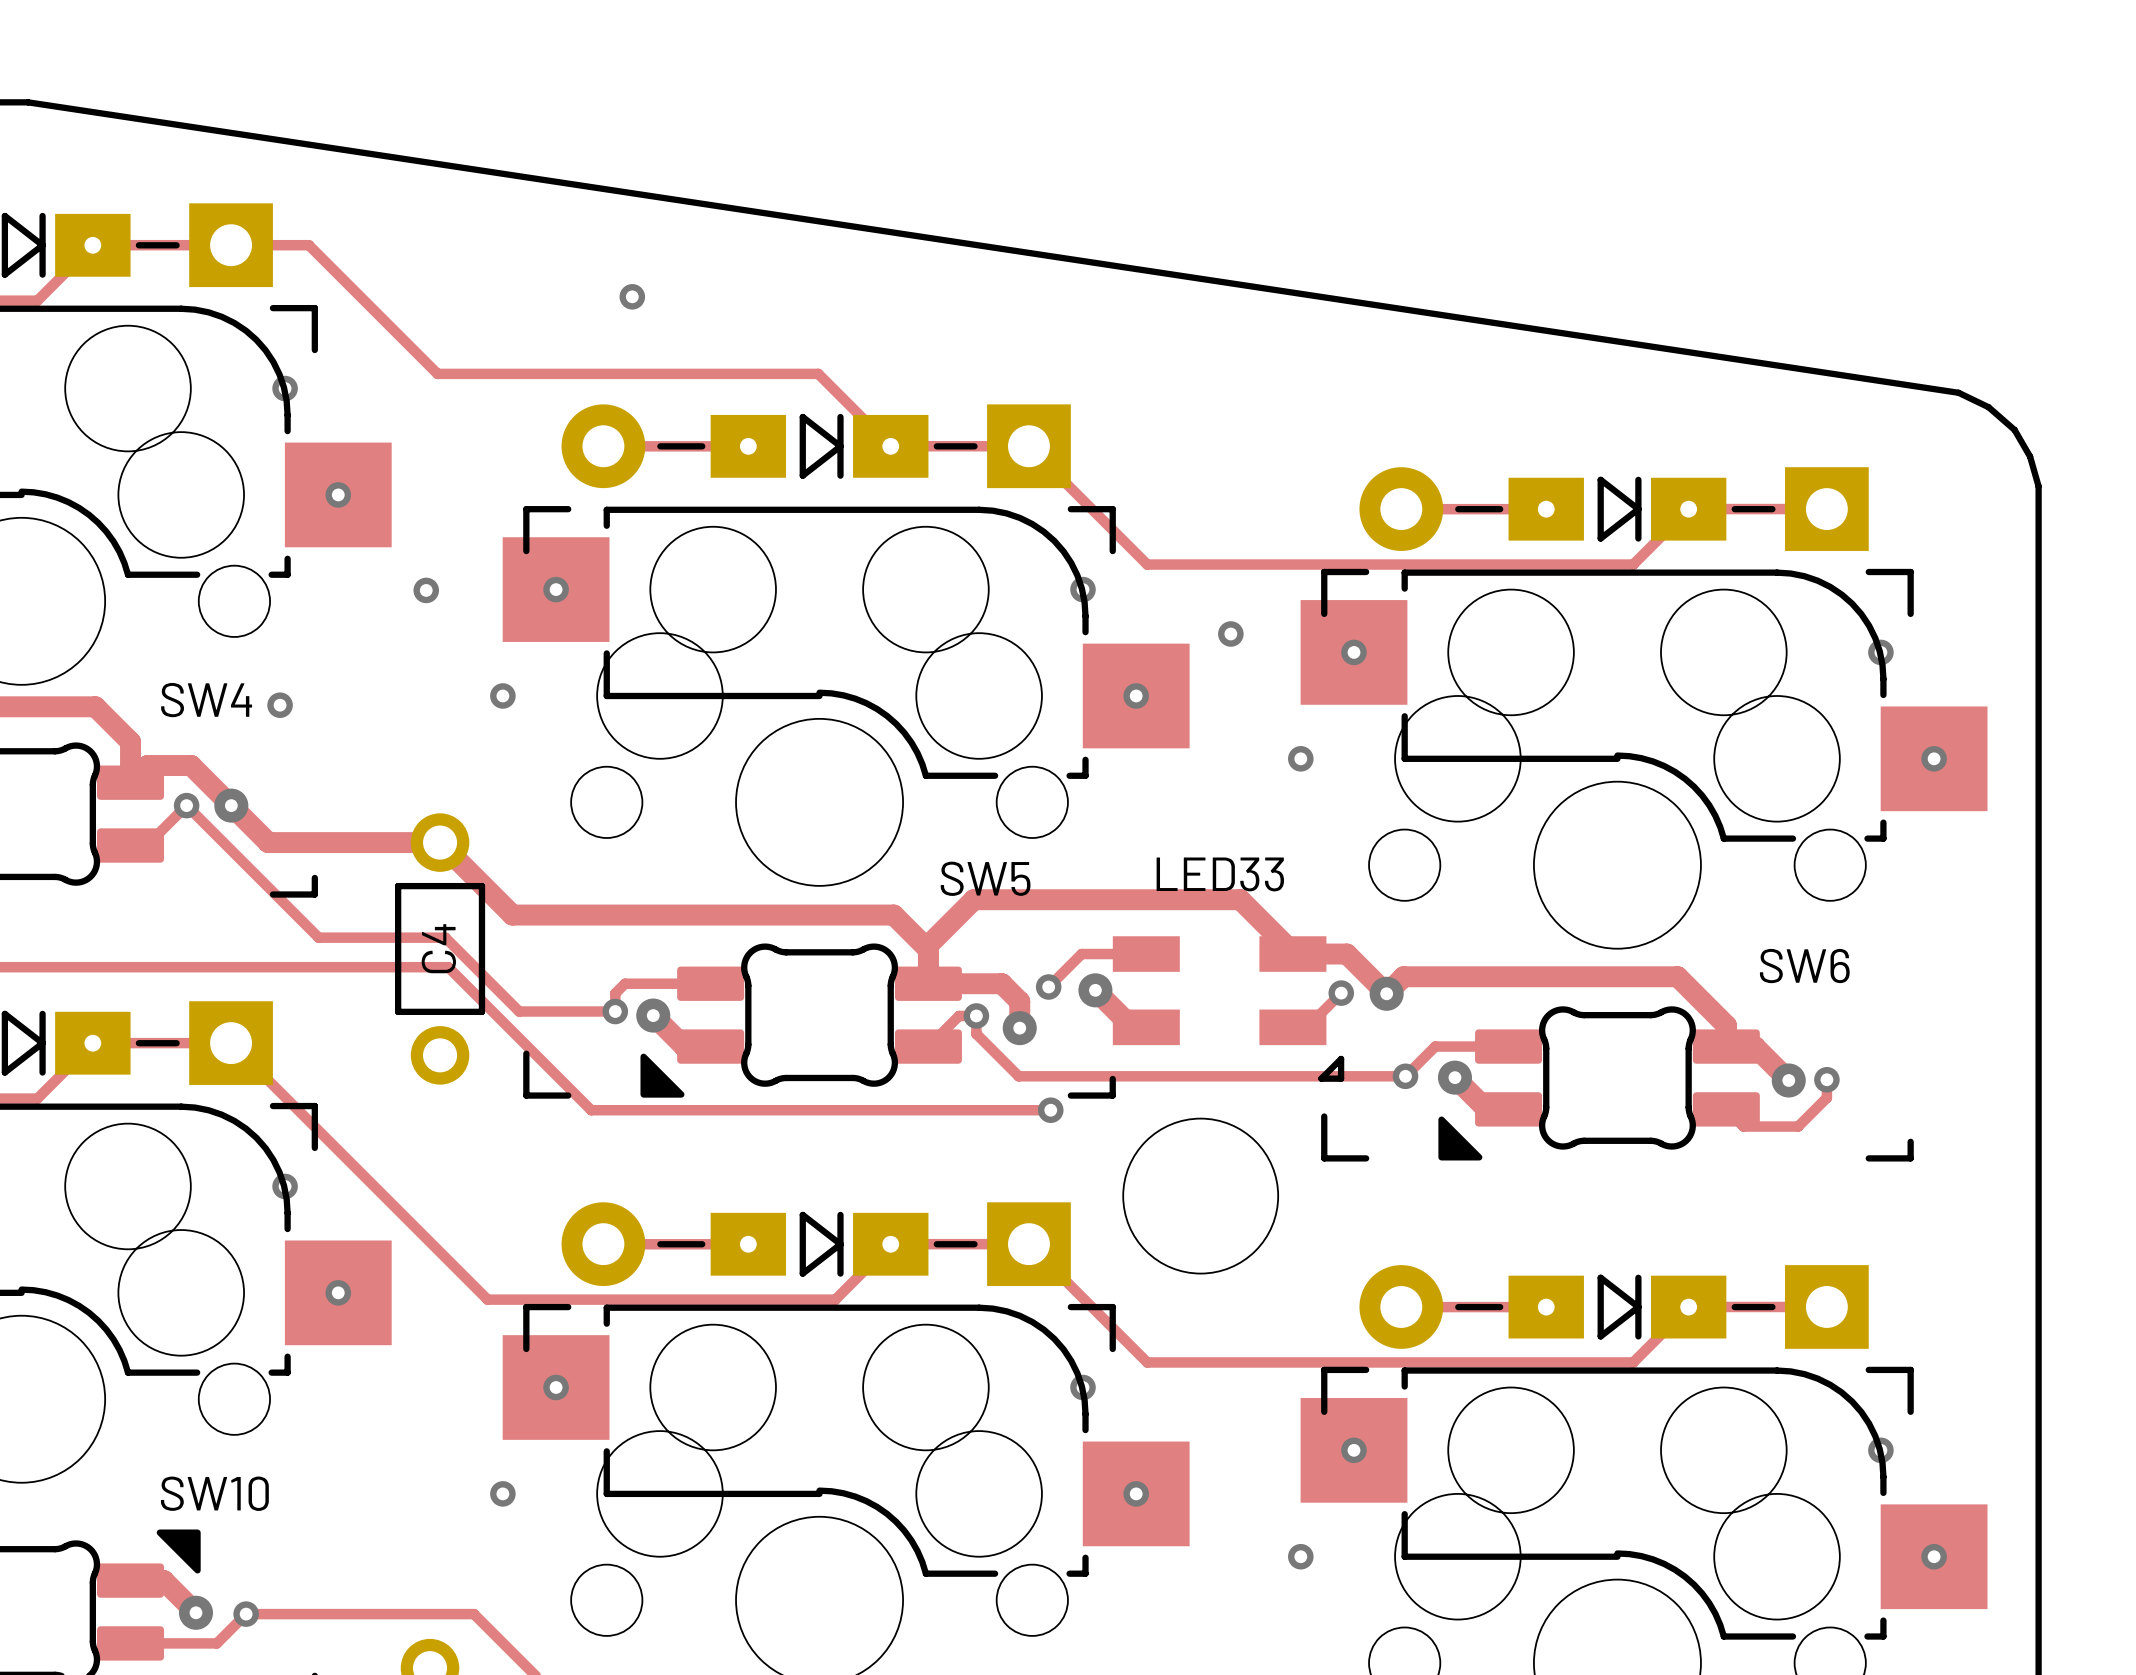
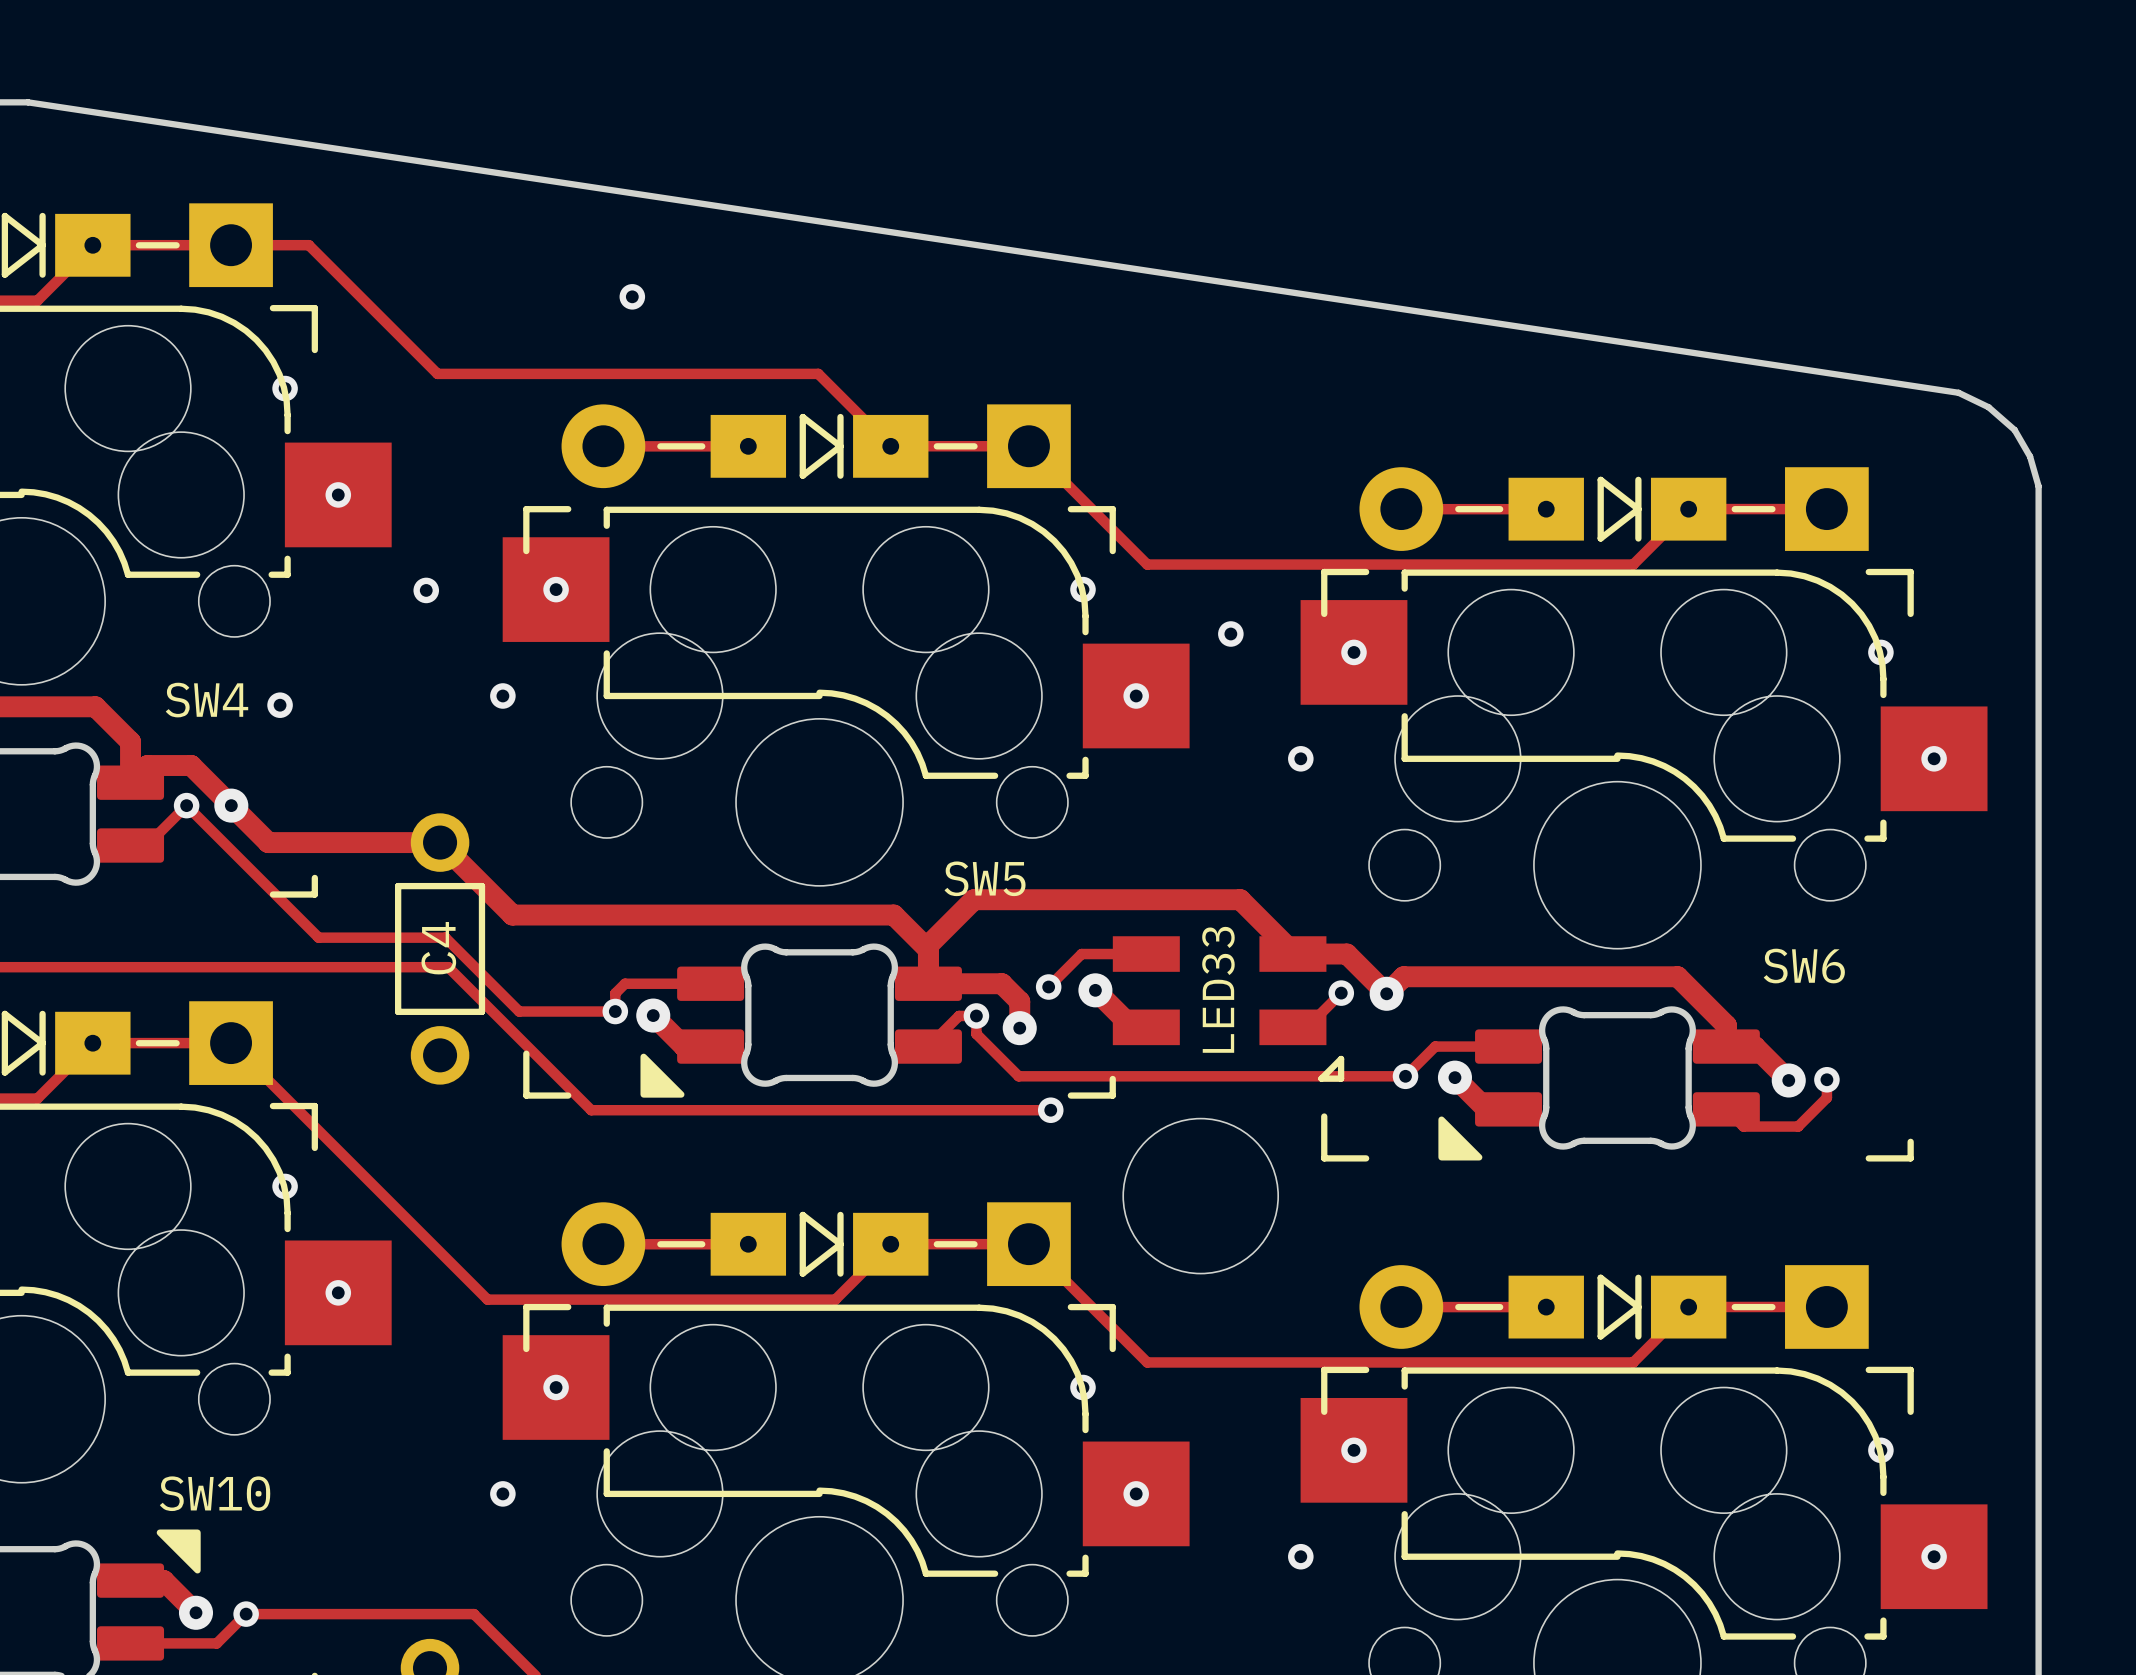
LED33 name rotation: 0° (1220, 874) -> 90° counterclockwise (1218, 989)

